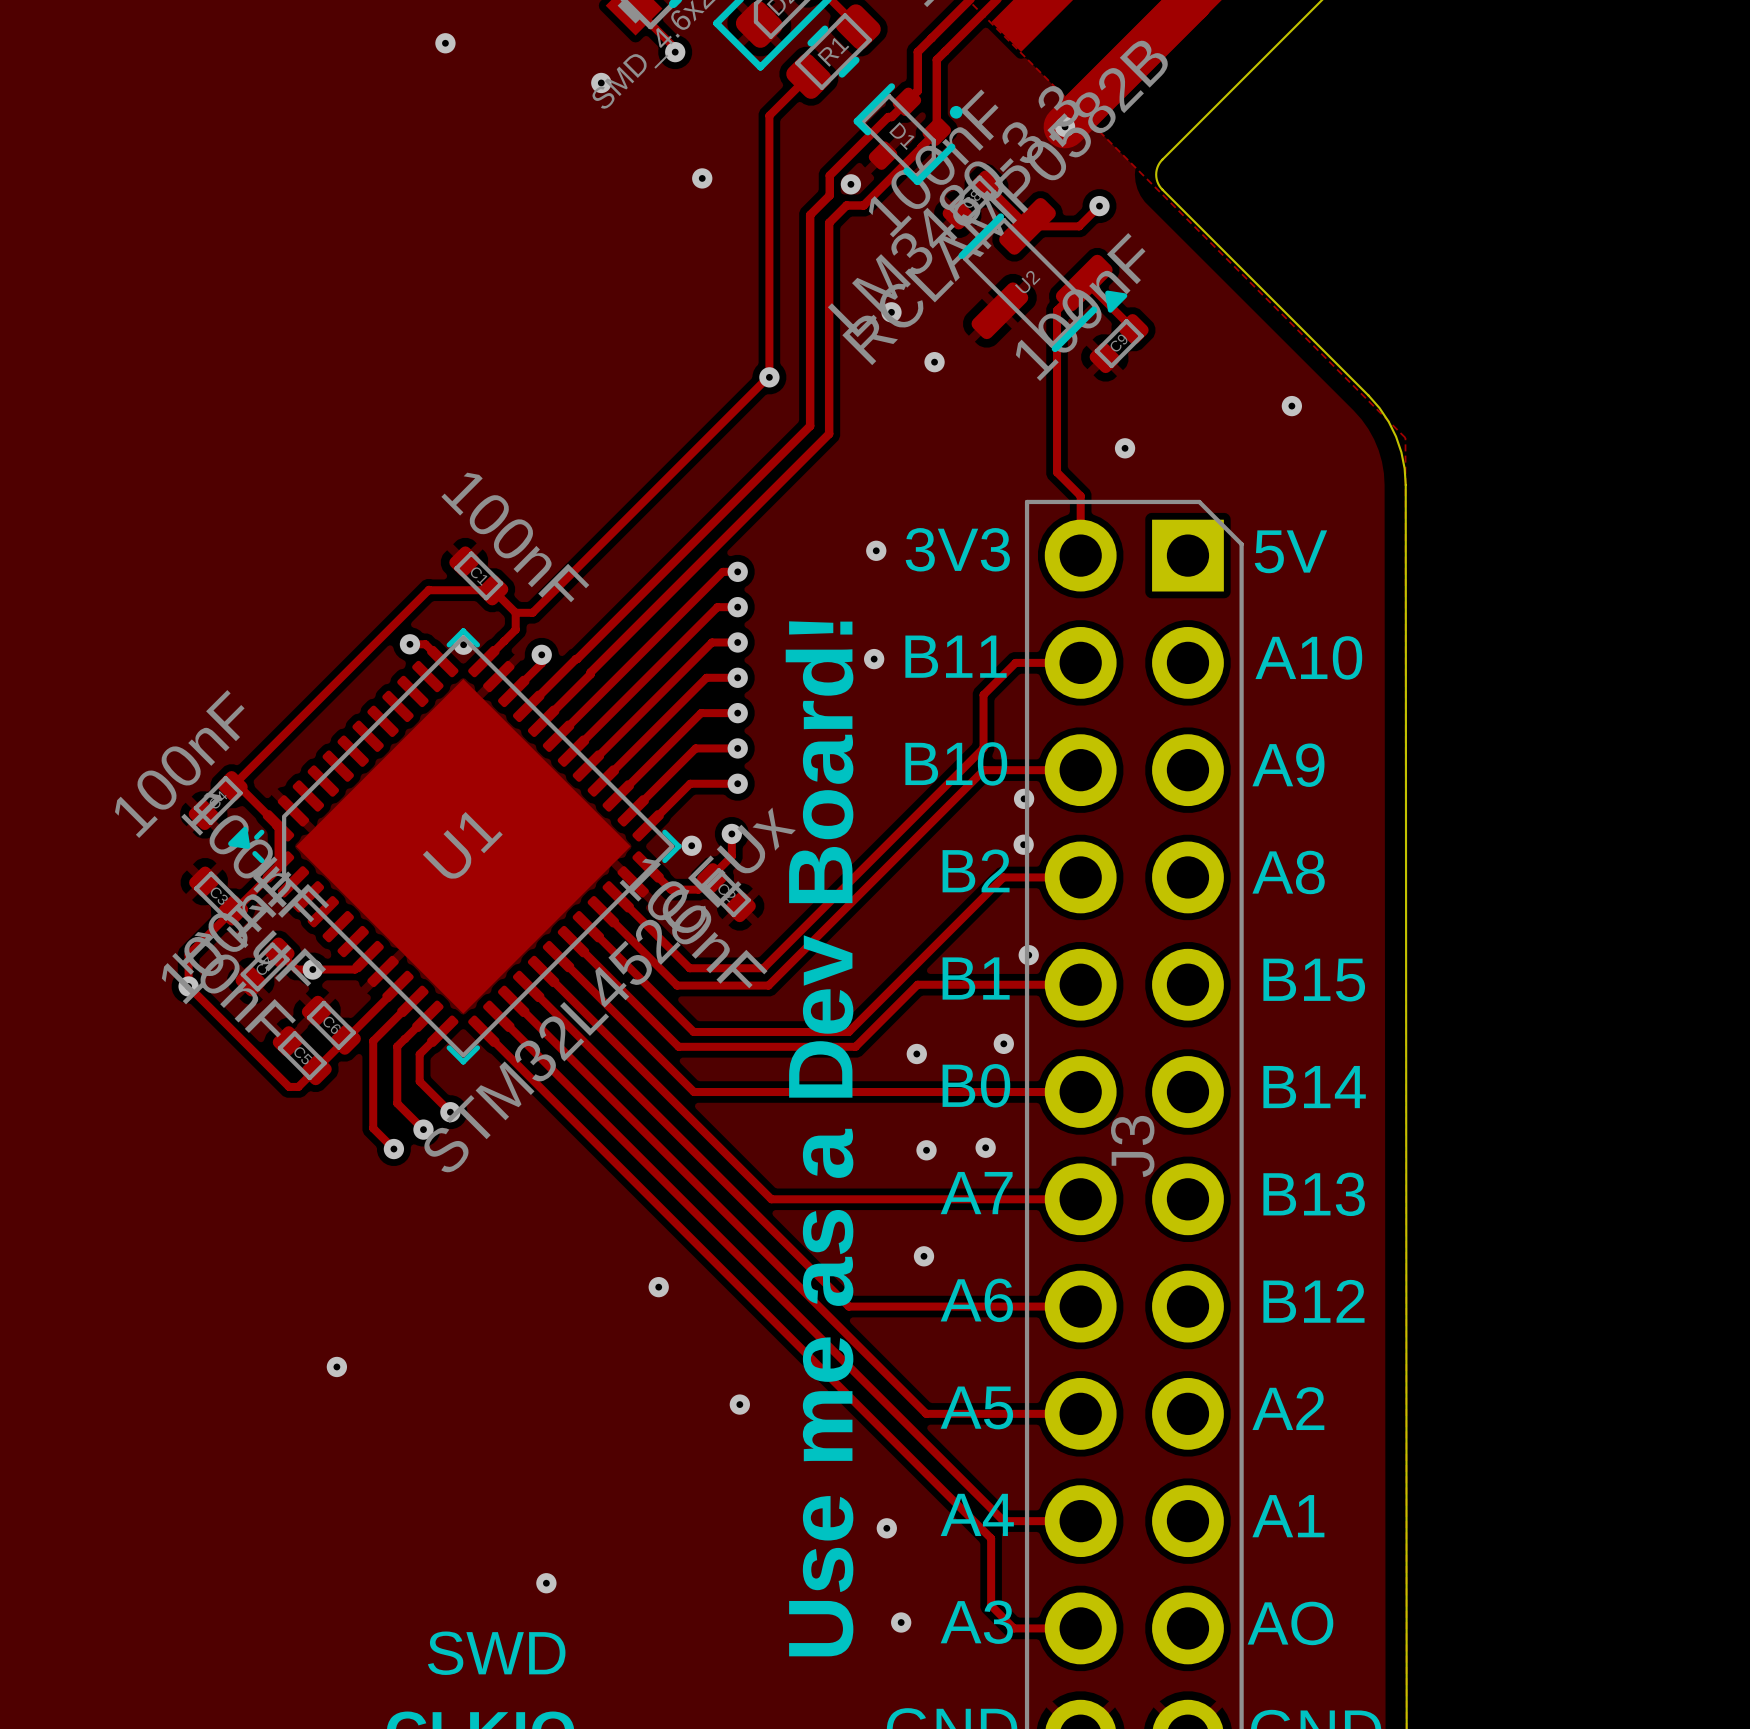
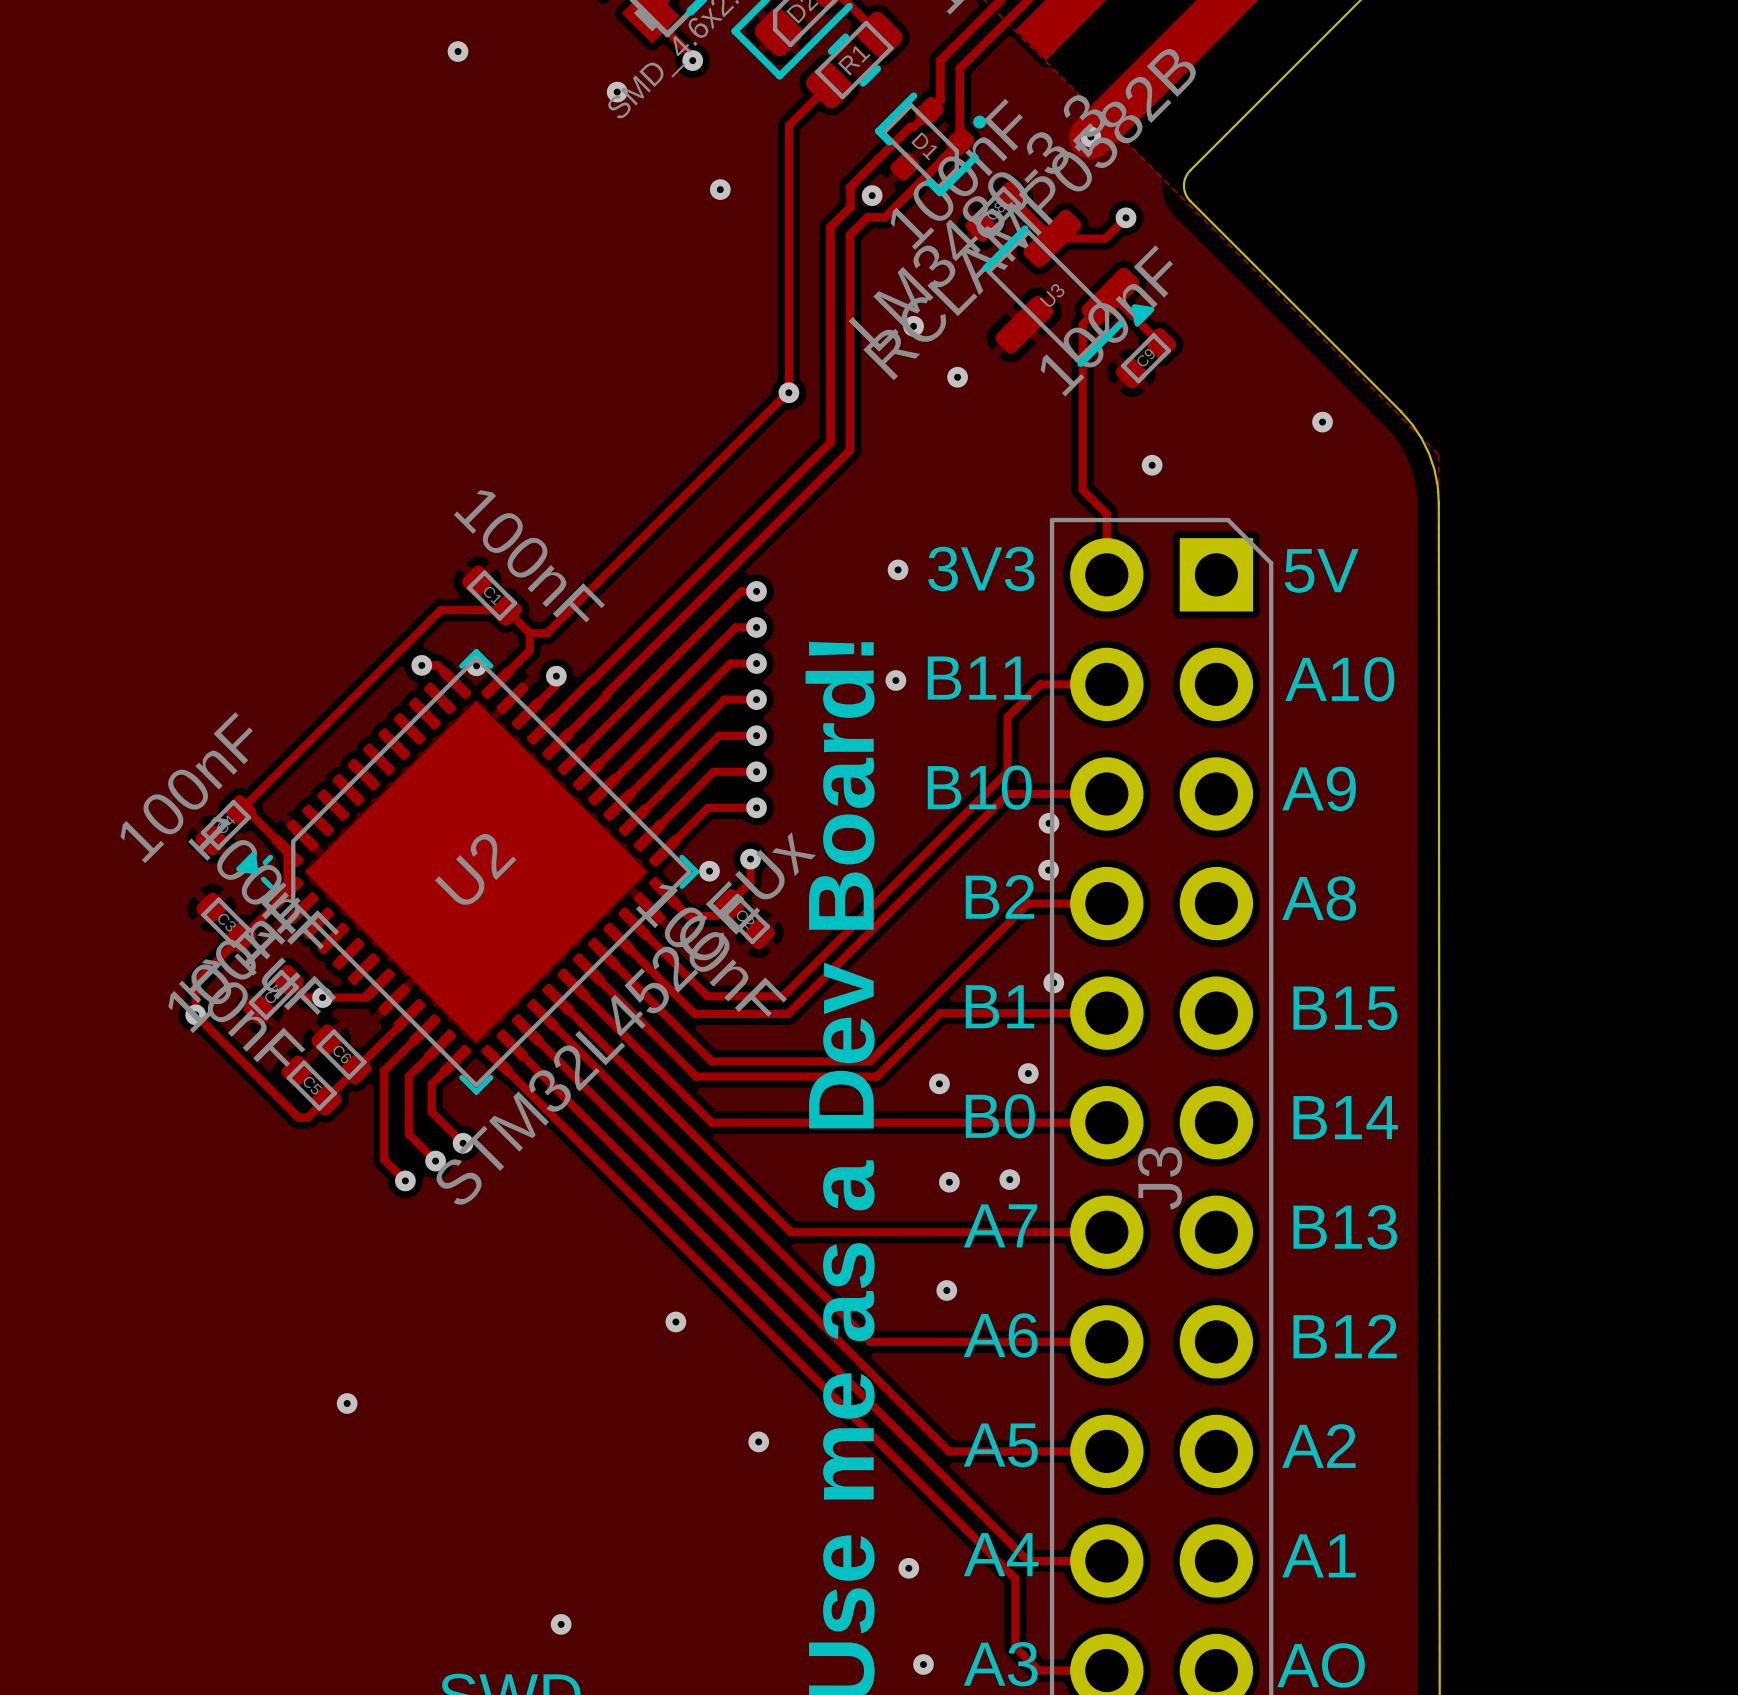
U2 name: U2 (1027, 282) -> U3 (1052, 295)
U1 name: U1 (462, 845) -> U2 (475, 869)

